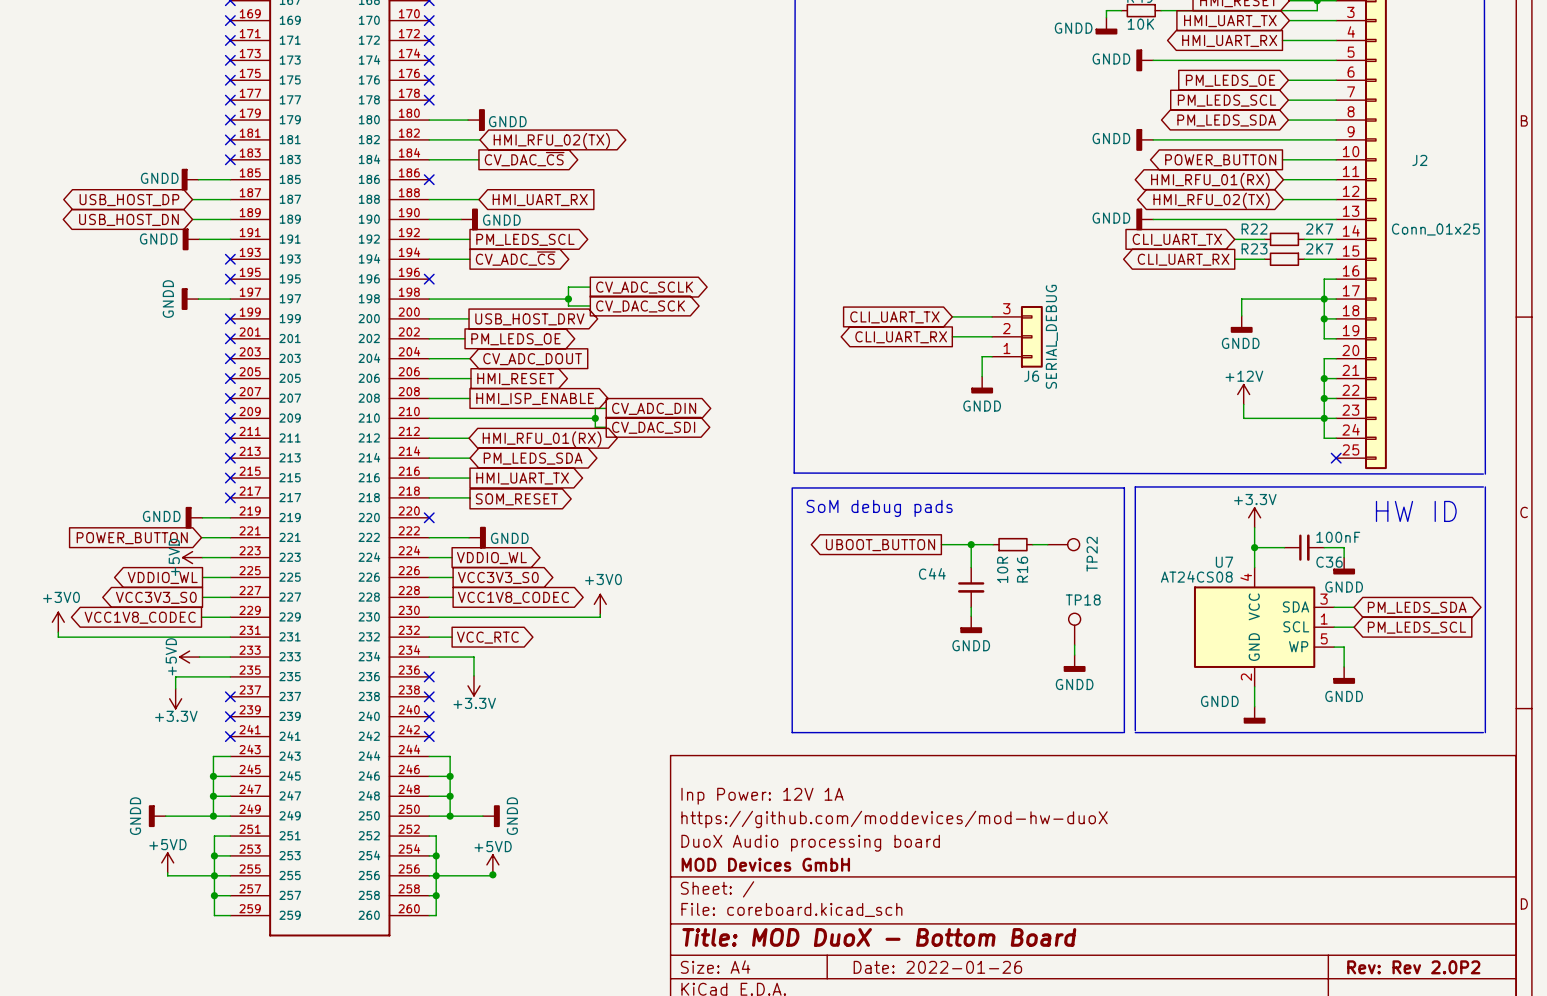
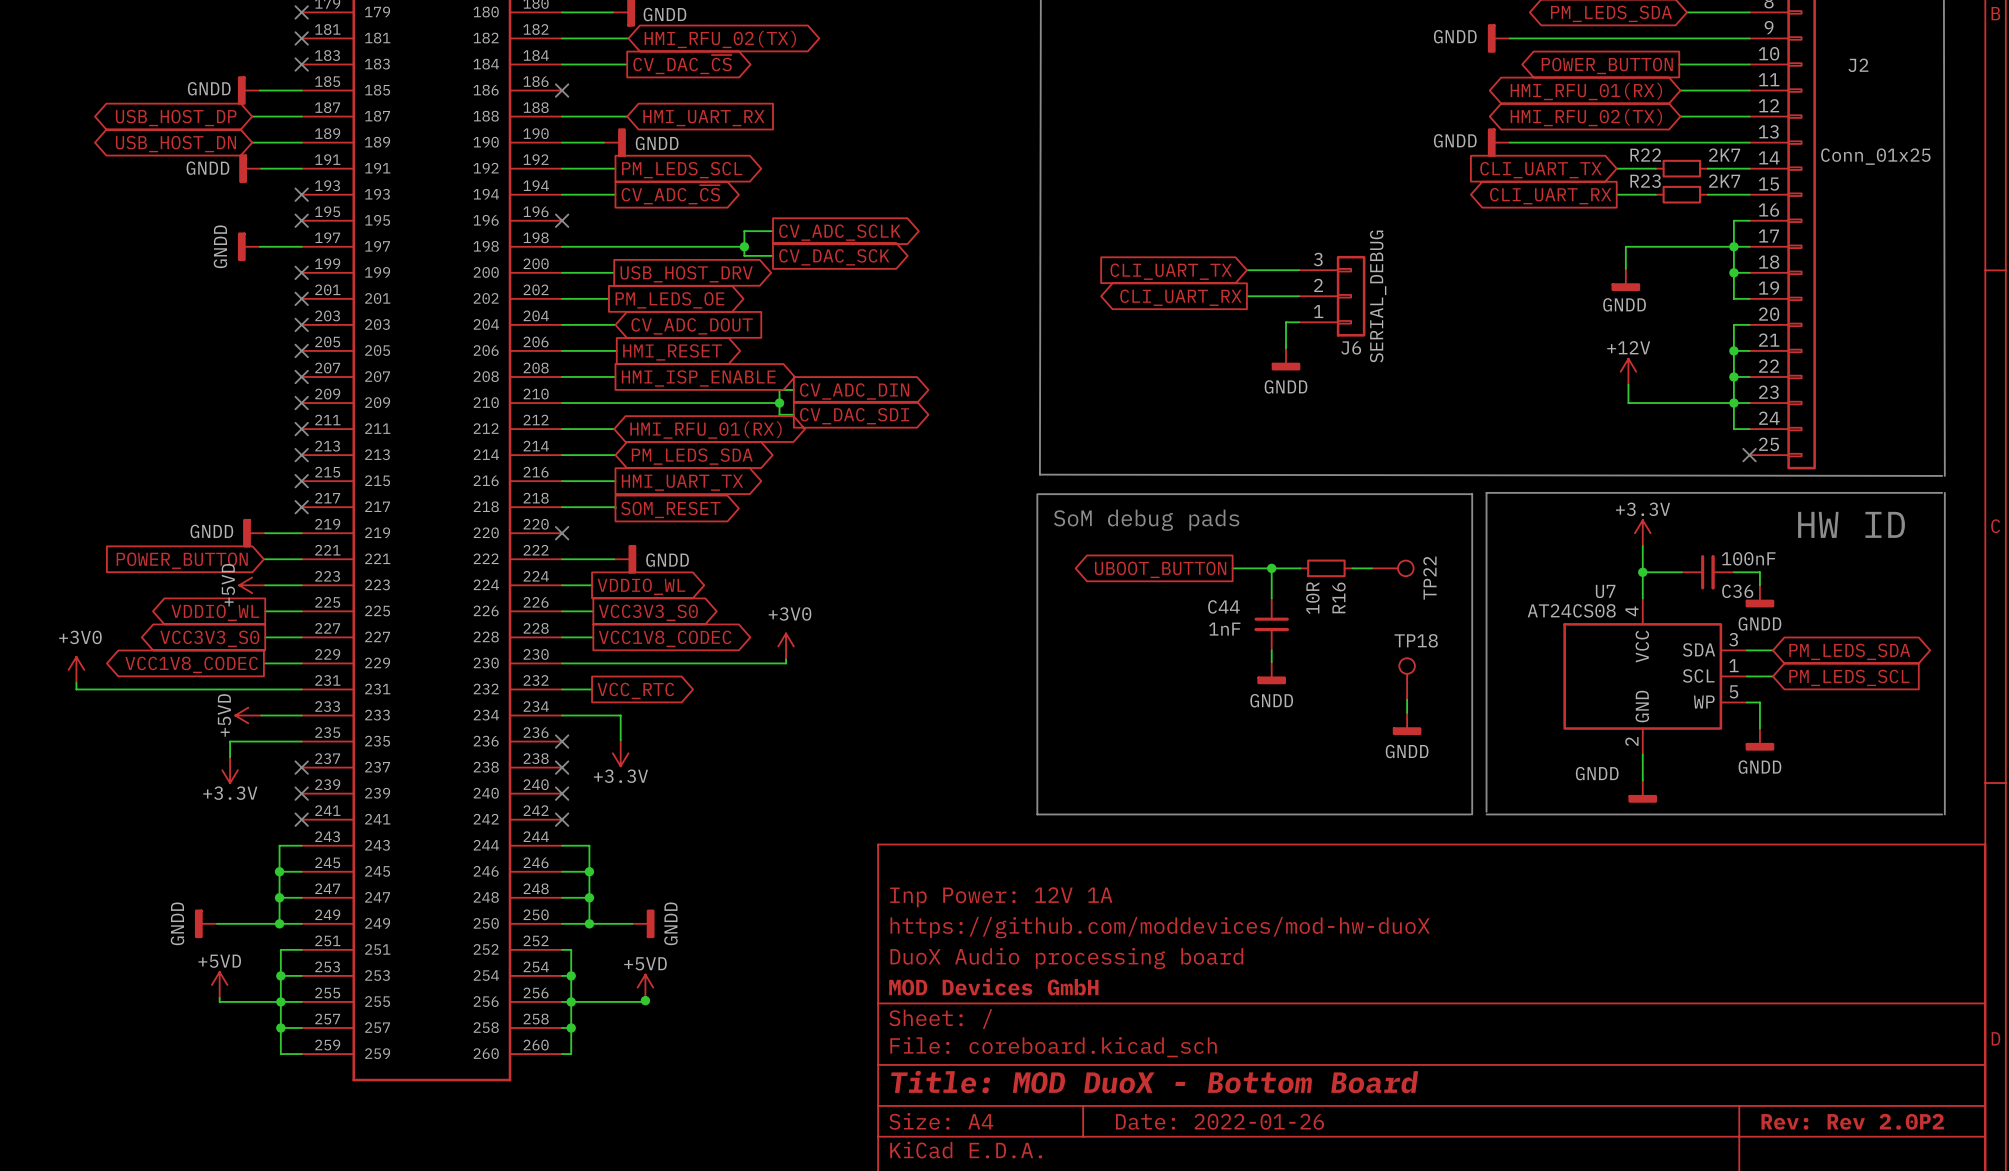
C44 value: none -> 1nF (1224, 629)

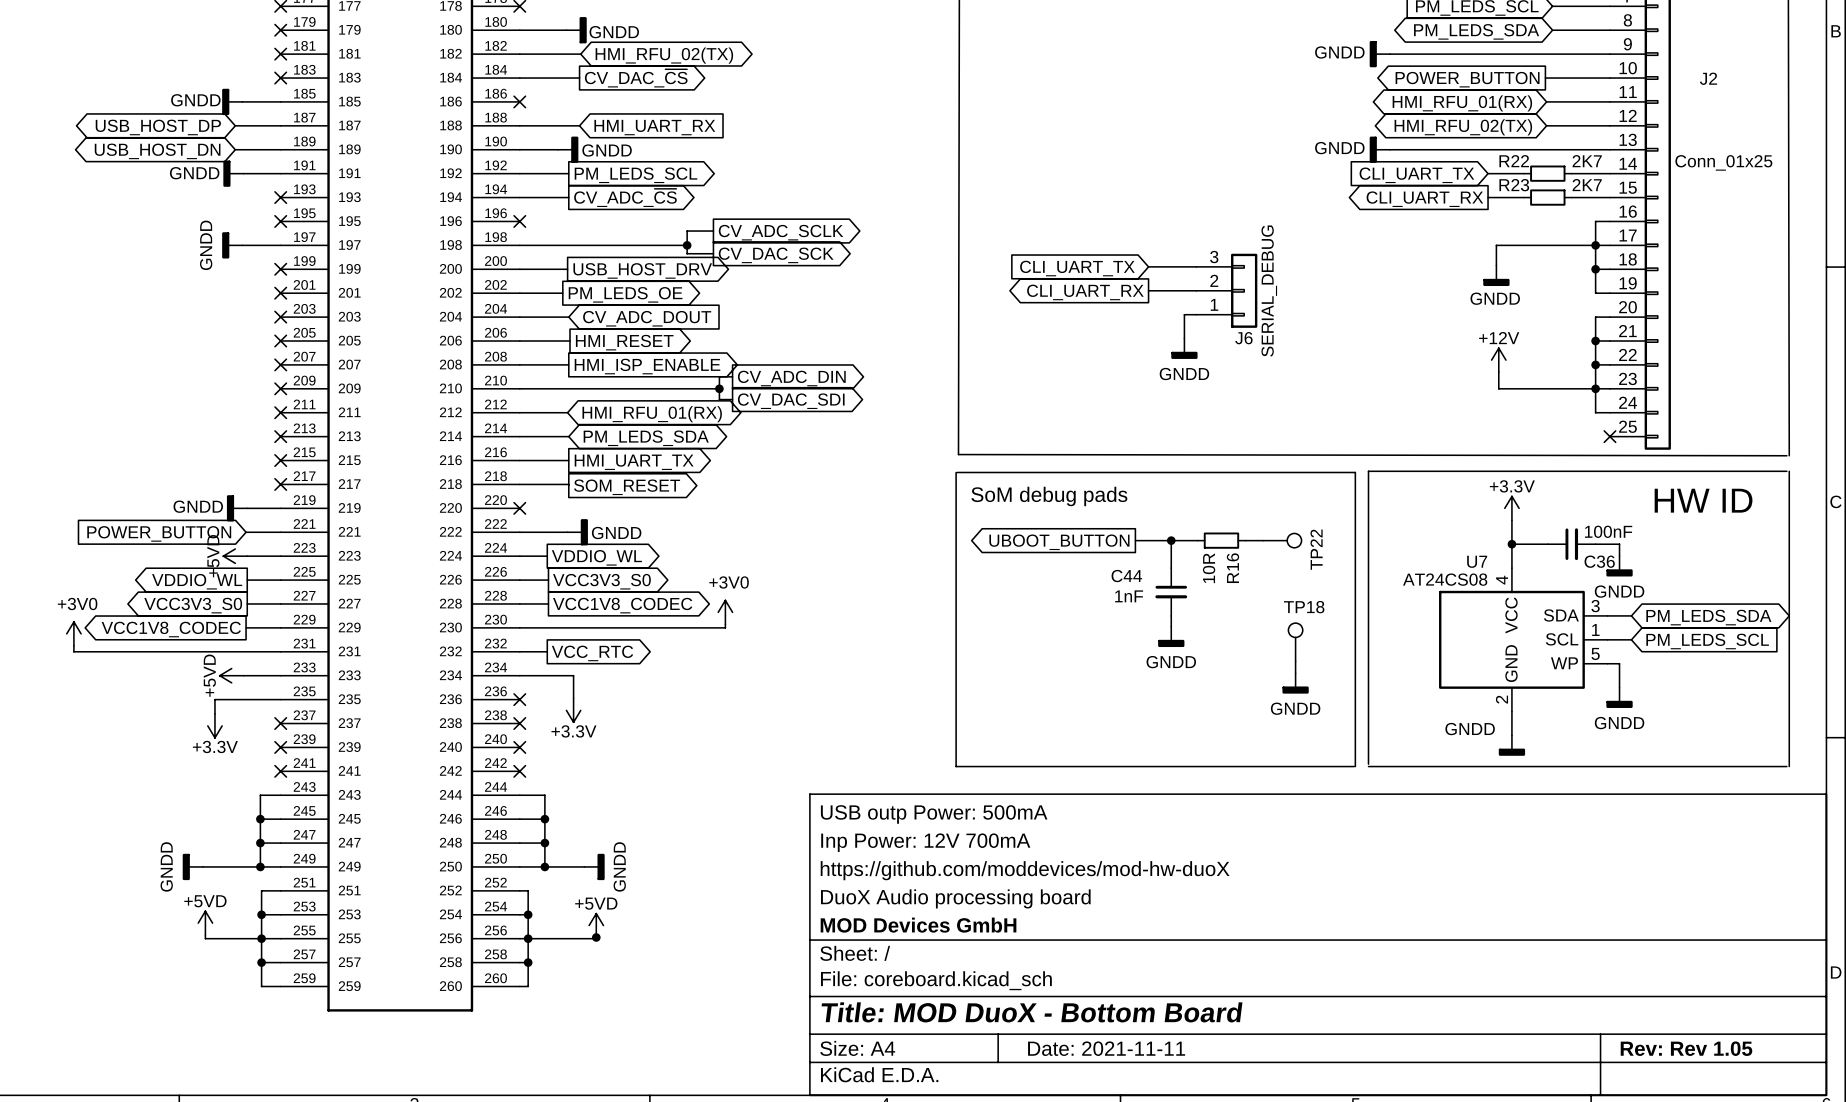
title block: none -> USB outp Power: 500mA (934, 814)
title block: Inp Power: 12V 1A (1001, 897) -> Inp Power: 12V 700mA (925, 842)
title block: Date: 2022-01-26 (1219, 1121) -> Date: 2021-11-11 (1106, 1048)
title block: Rev: Rev 2.0P2 (1852, 1121) -> Rev: Rev 1.05 (1686, 1048)

